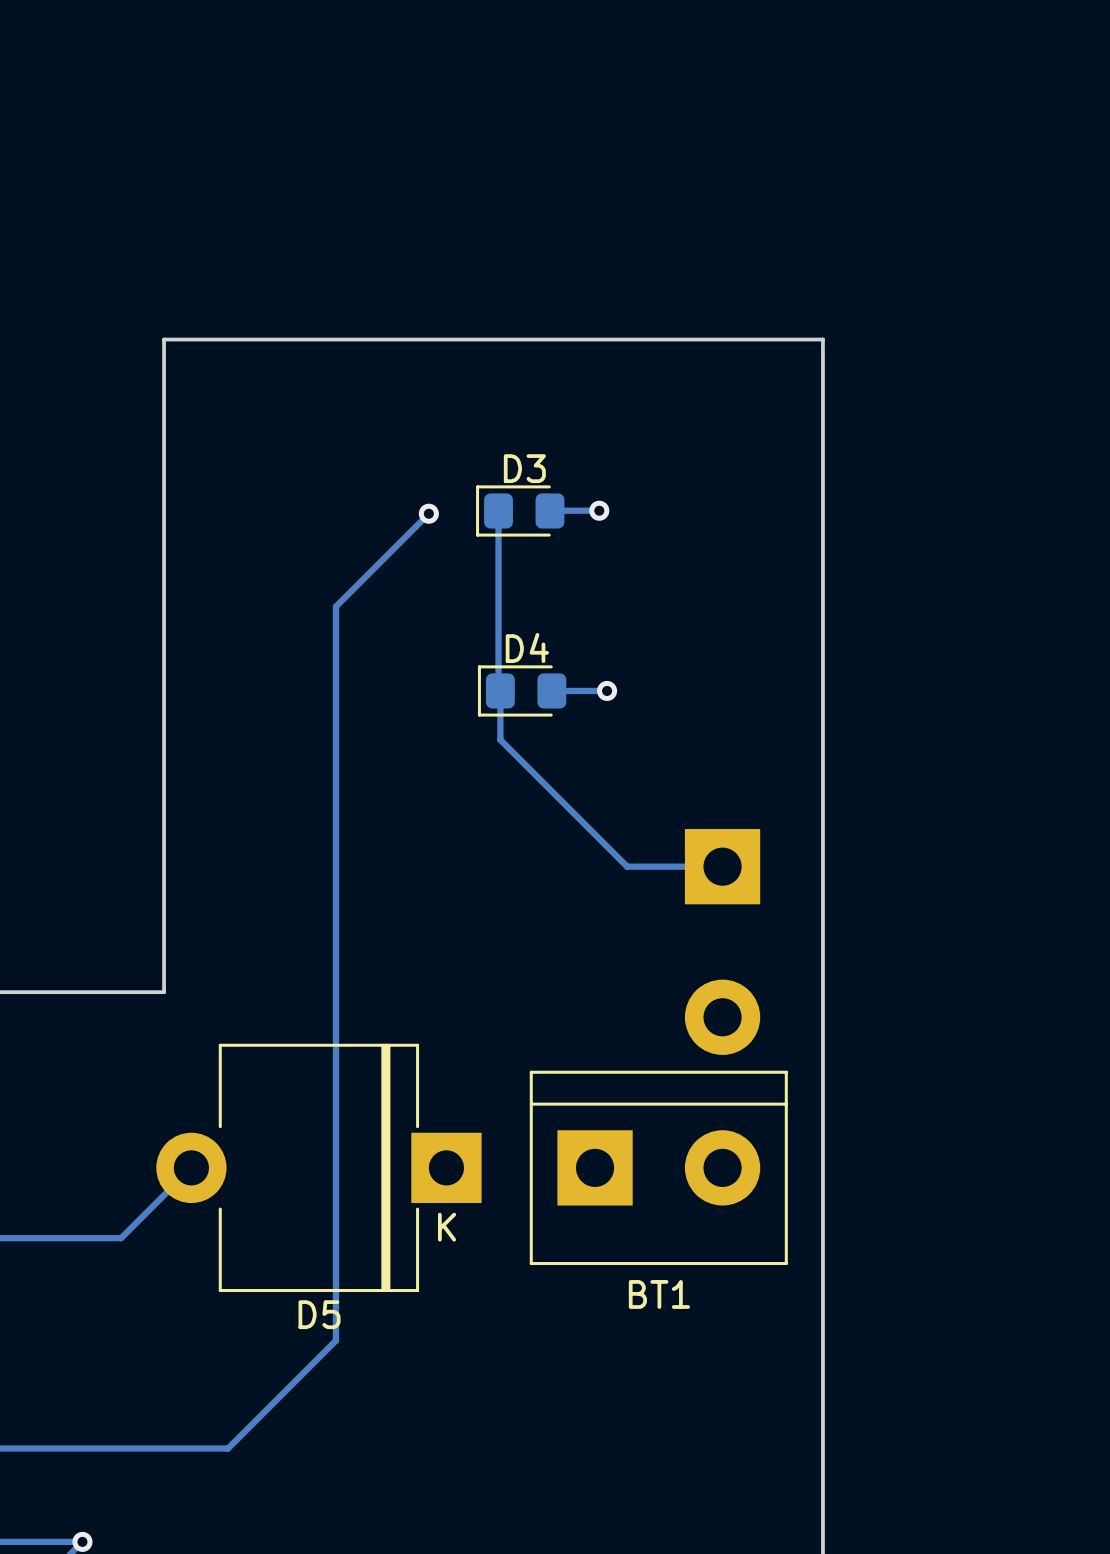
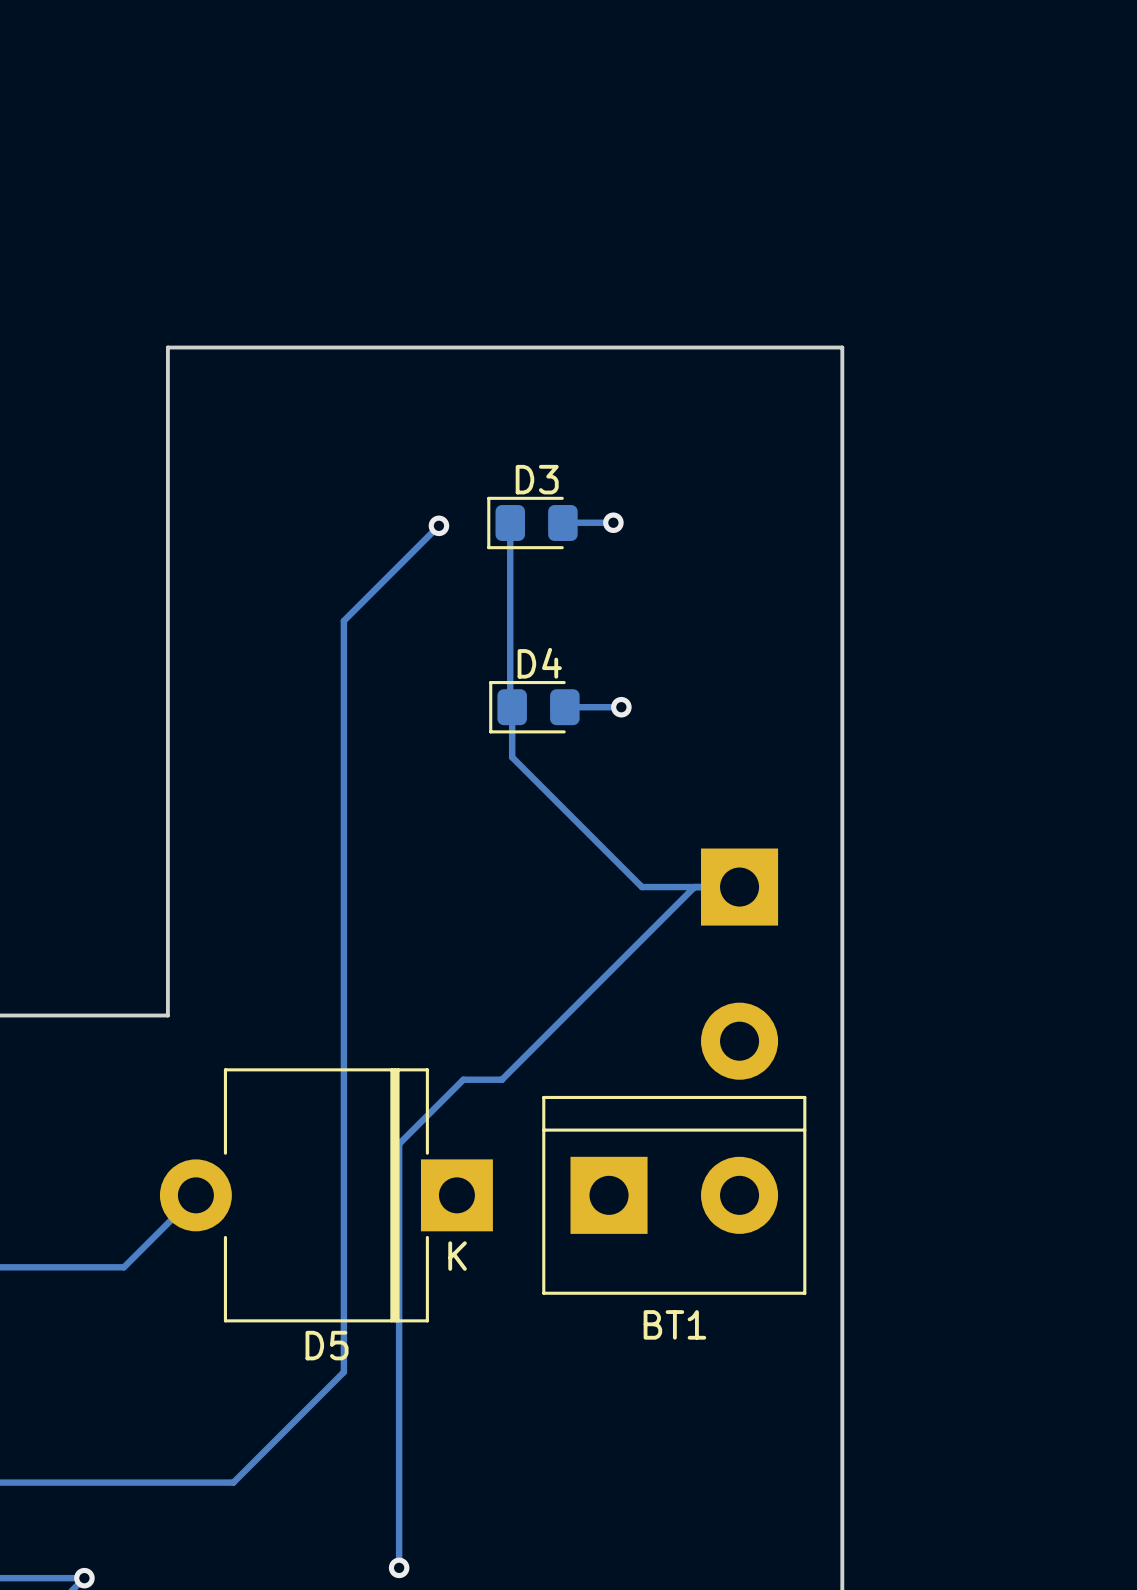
track: none -> (694, 887) (501, 1079) (463, 1079) (399, 1143) (399, 1567)
via: none -> (399, 1567)

